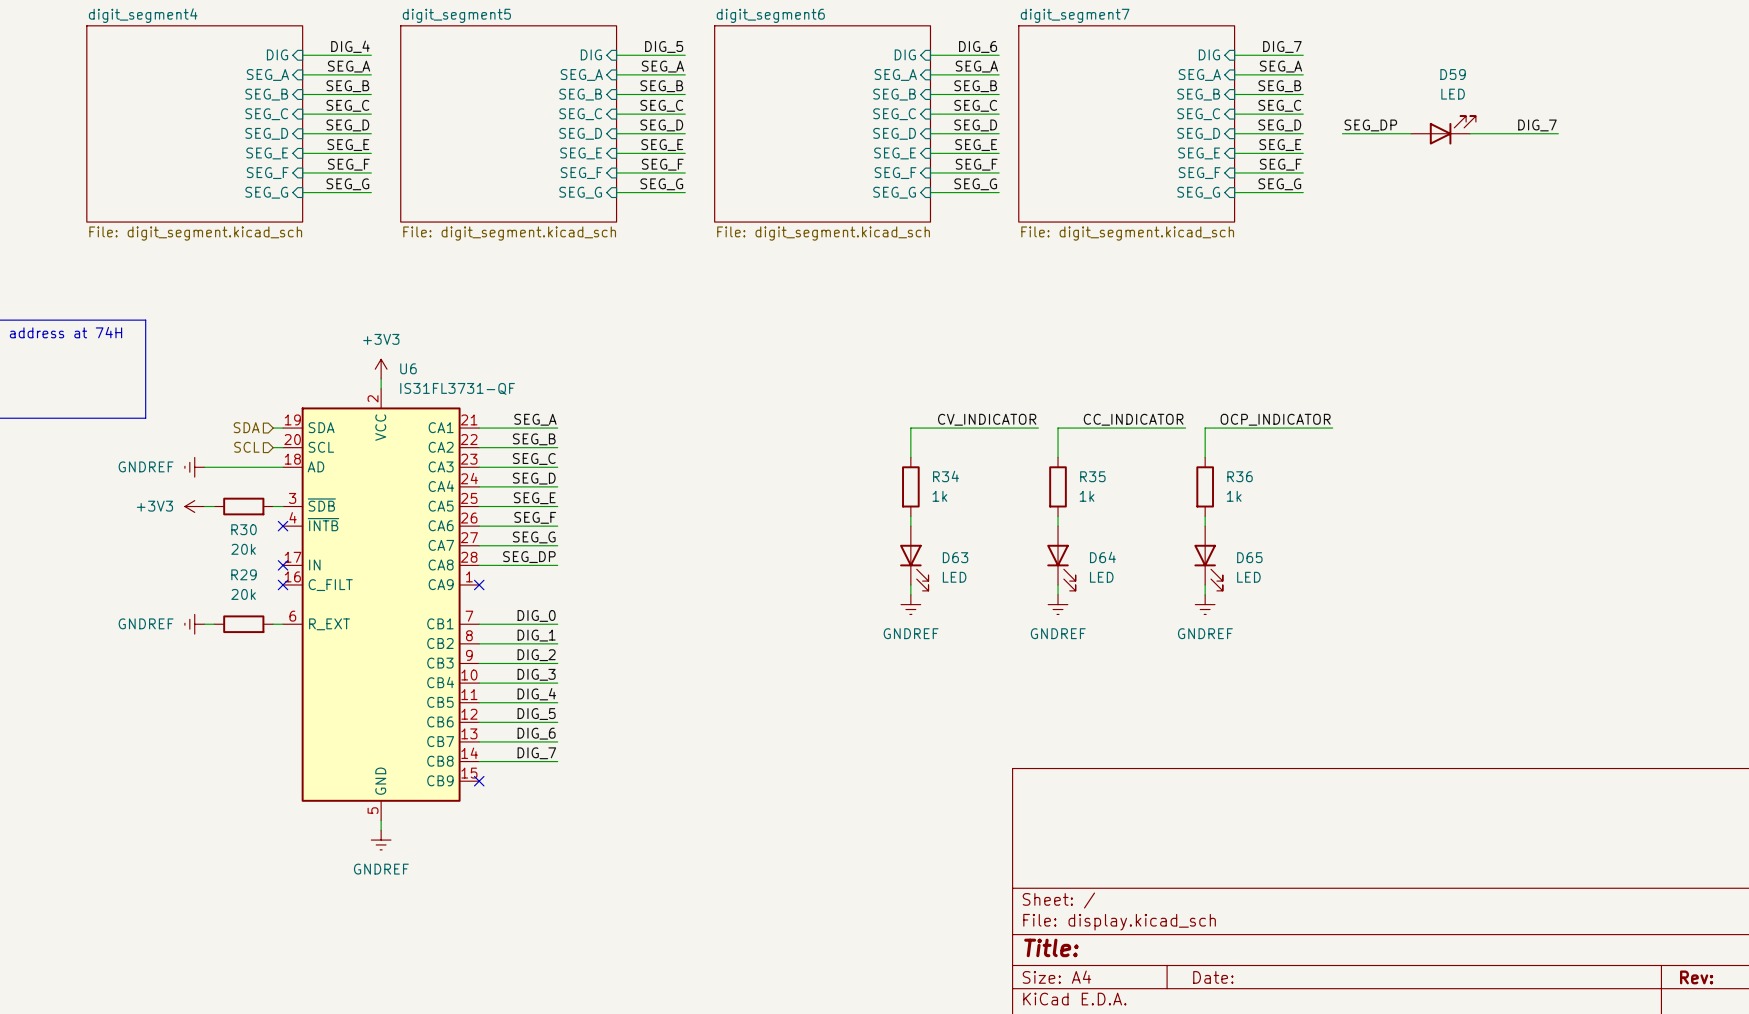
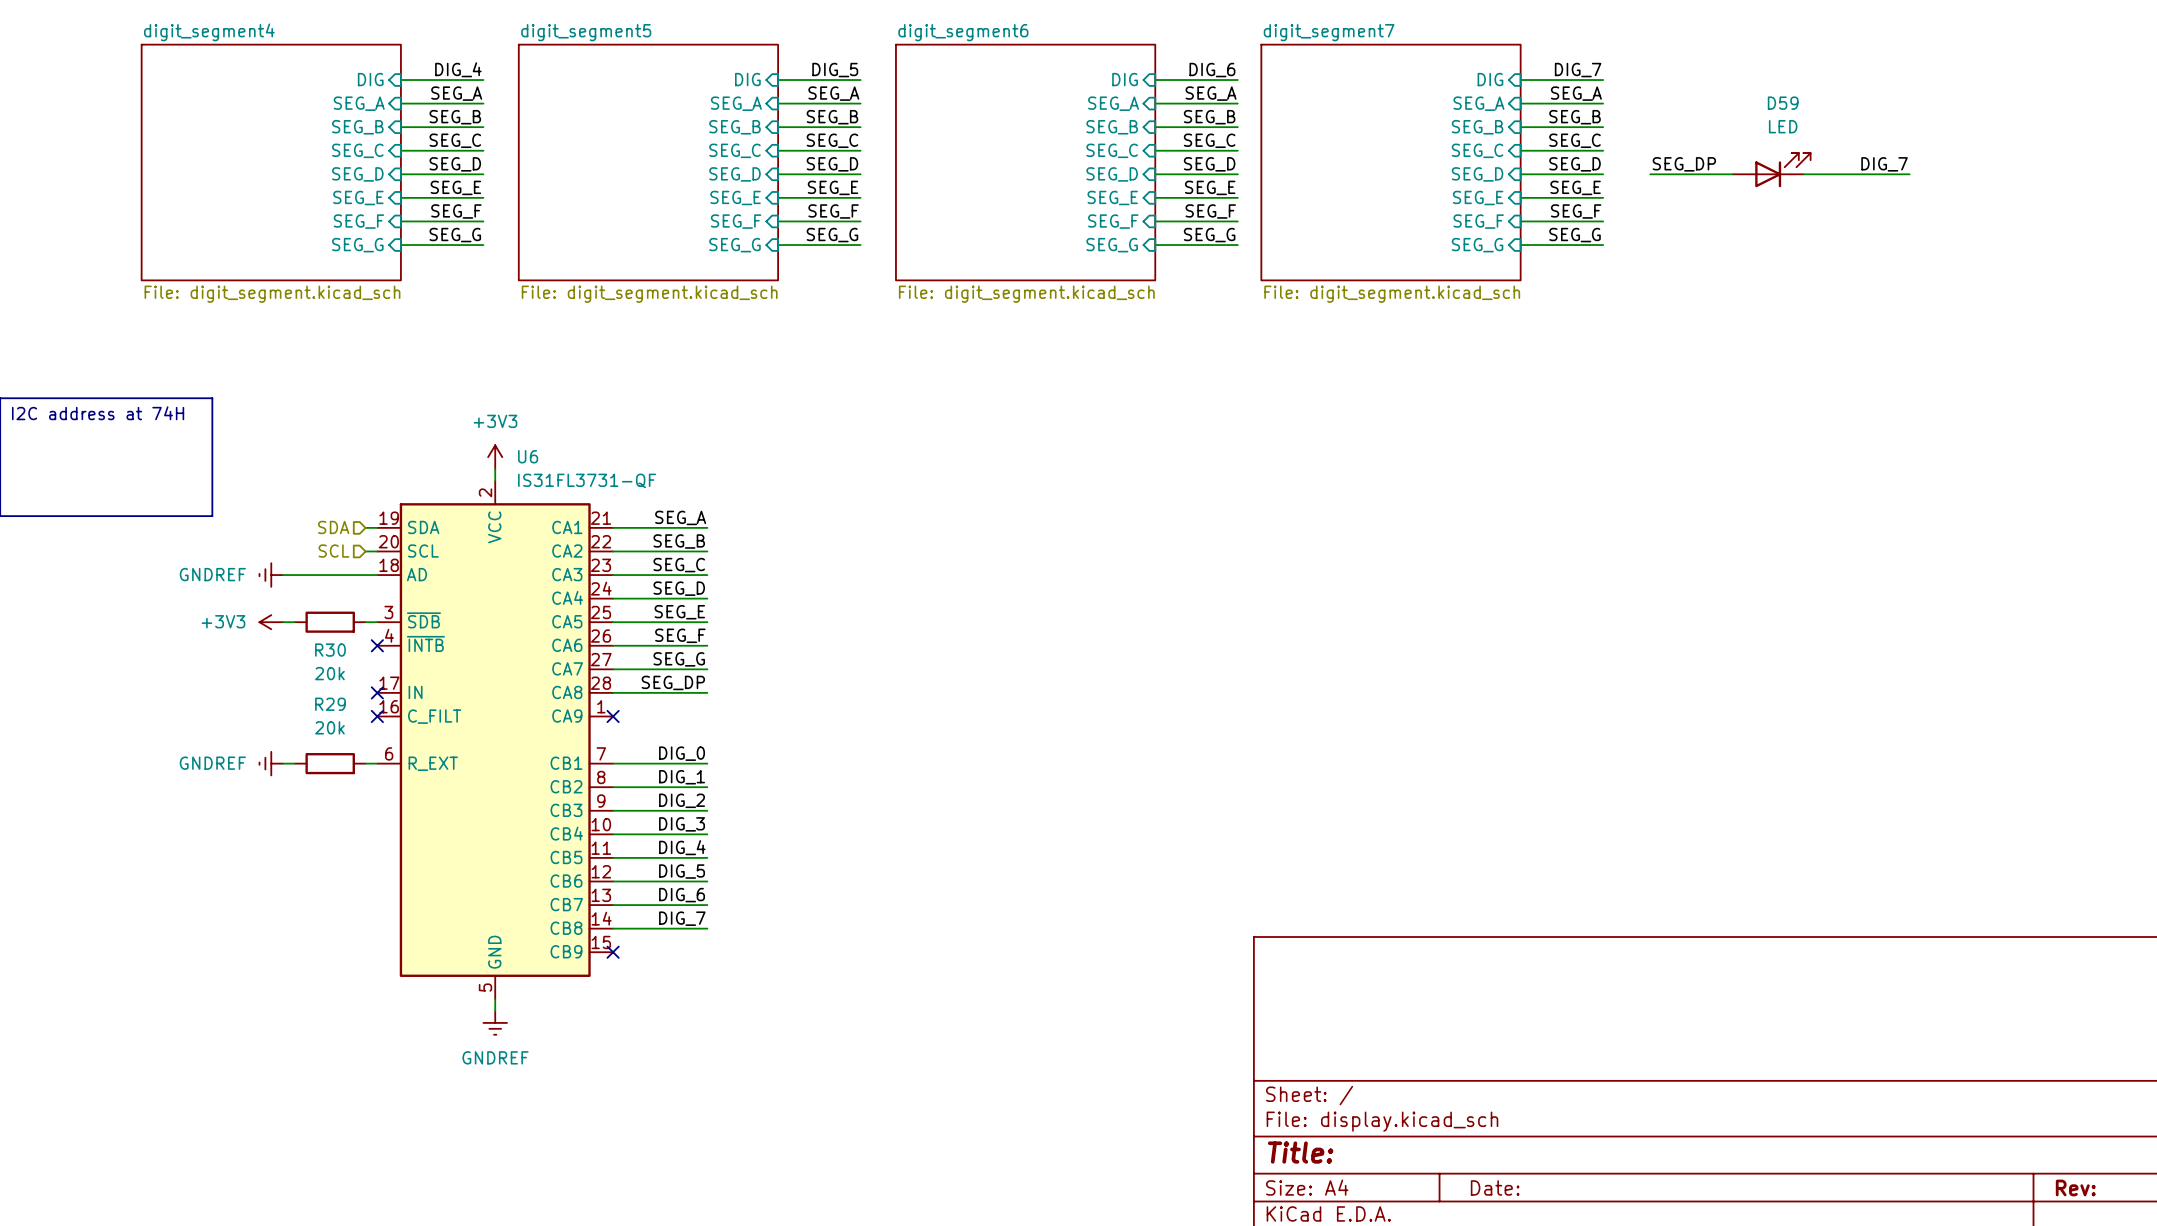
label: CV_INDICATOR (987, 419) -> none
label: CC_INDICATOR (1133, 419) -> none
label: OCP_INDICATOR (1275, 419) -> none
wire: (1038, 428) (910, 428) (910, 457) -> none
wire: (1185, 428) (1058, 428) (1058, 457) -> none
wire: (1332, 428) (1205, 428) (1205, 457) -> none
R34: 1k (910, 486) -> none
R35: 1k (1058, 486) -> none
R36: 1k (1205, 486) -> none
wire: (910, 516) (910, 526) -> none
wire: (1058, 516) (1058, 526) -> none
wire: (1205, 516) (1205, 526) -> none
D63: LED (914, 558) -> none
D64: LED (1061, 558) -> none
D65: LED (1208, 558) -> none
wire: (910, 584) (910, 594) -> none
wire: (1058, 584) (1058, 594) -> none
wire: (1205, 584) (1205, 594) -> none
power symbol: GNDREF (910, 604) -> none
power symbol: GNDREF (1058, 604) -> none
power symbol: GNDREF (1205, 604) -> none

